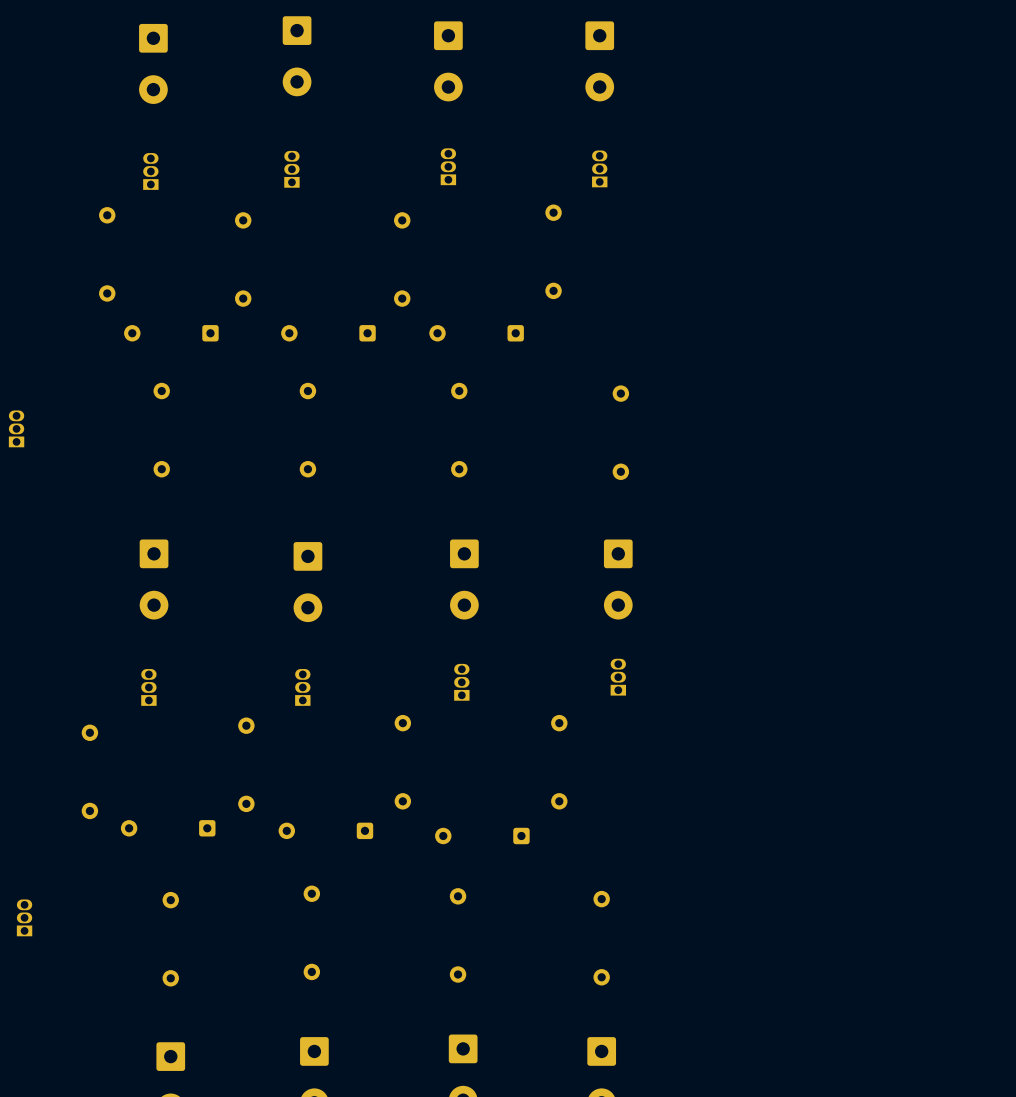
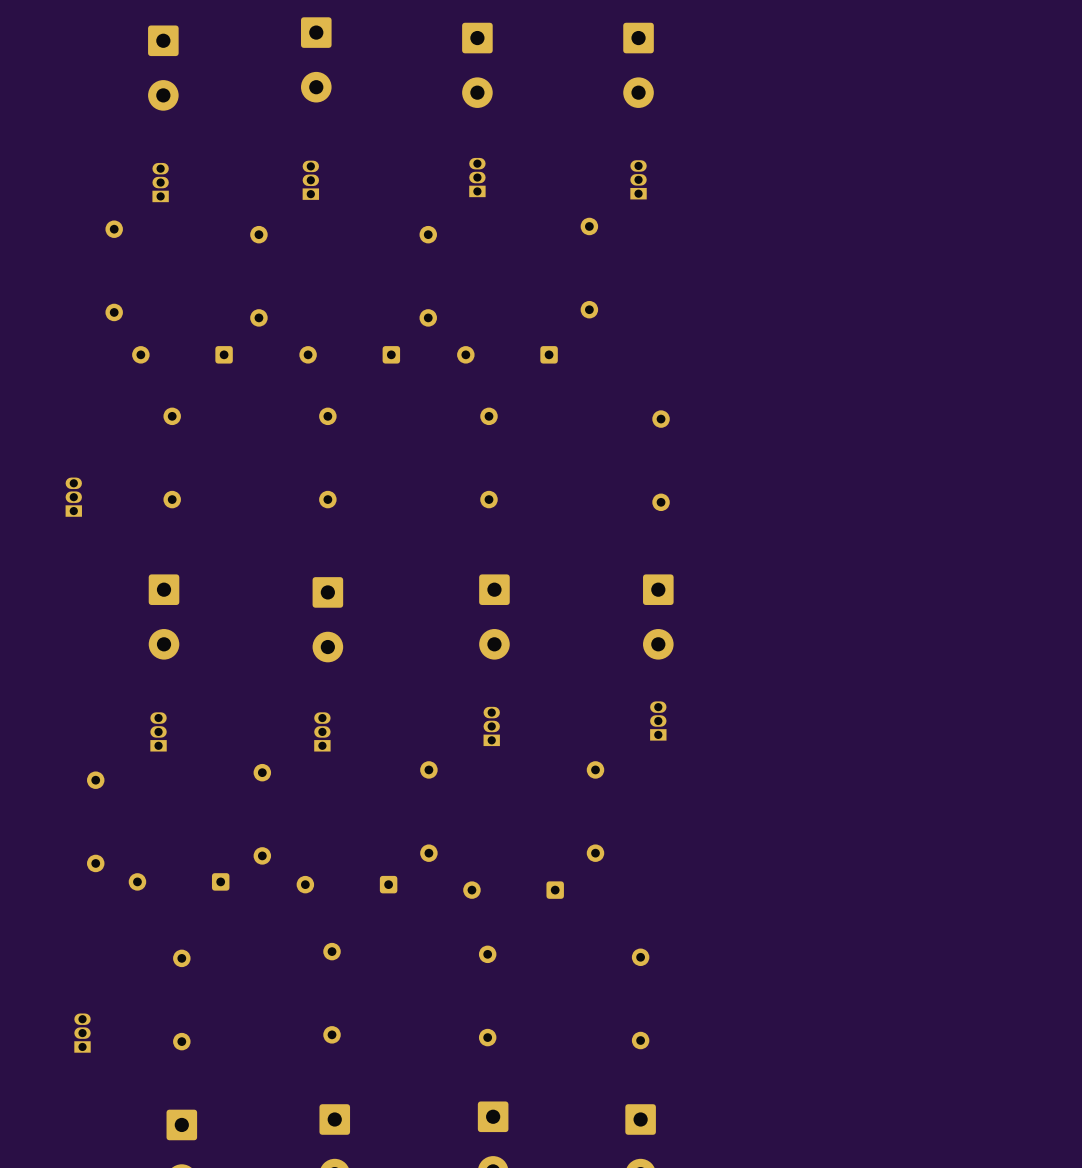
part position: (16, 428) -> (73, 497)
part position: (24, 917) -> (82, 1033)

